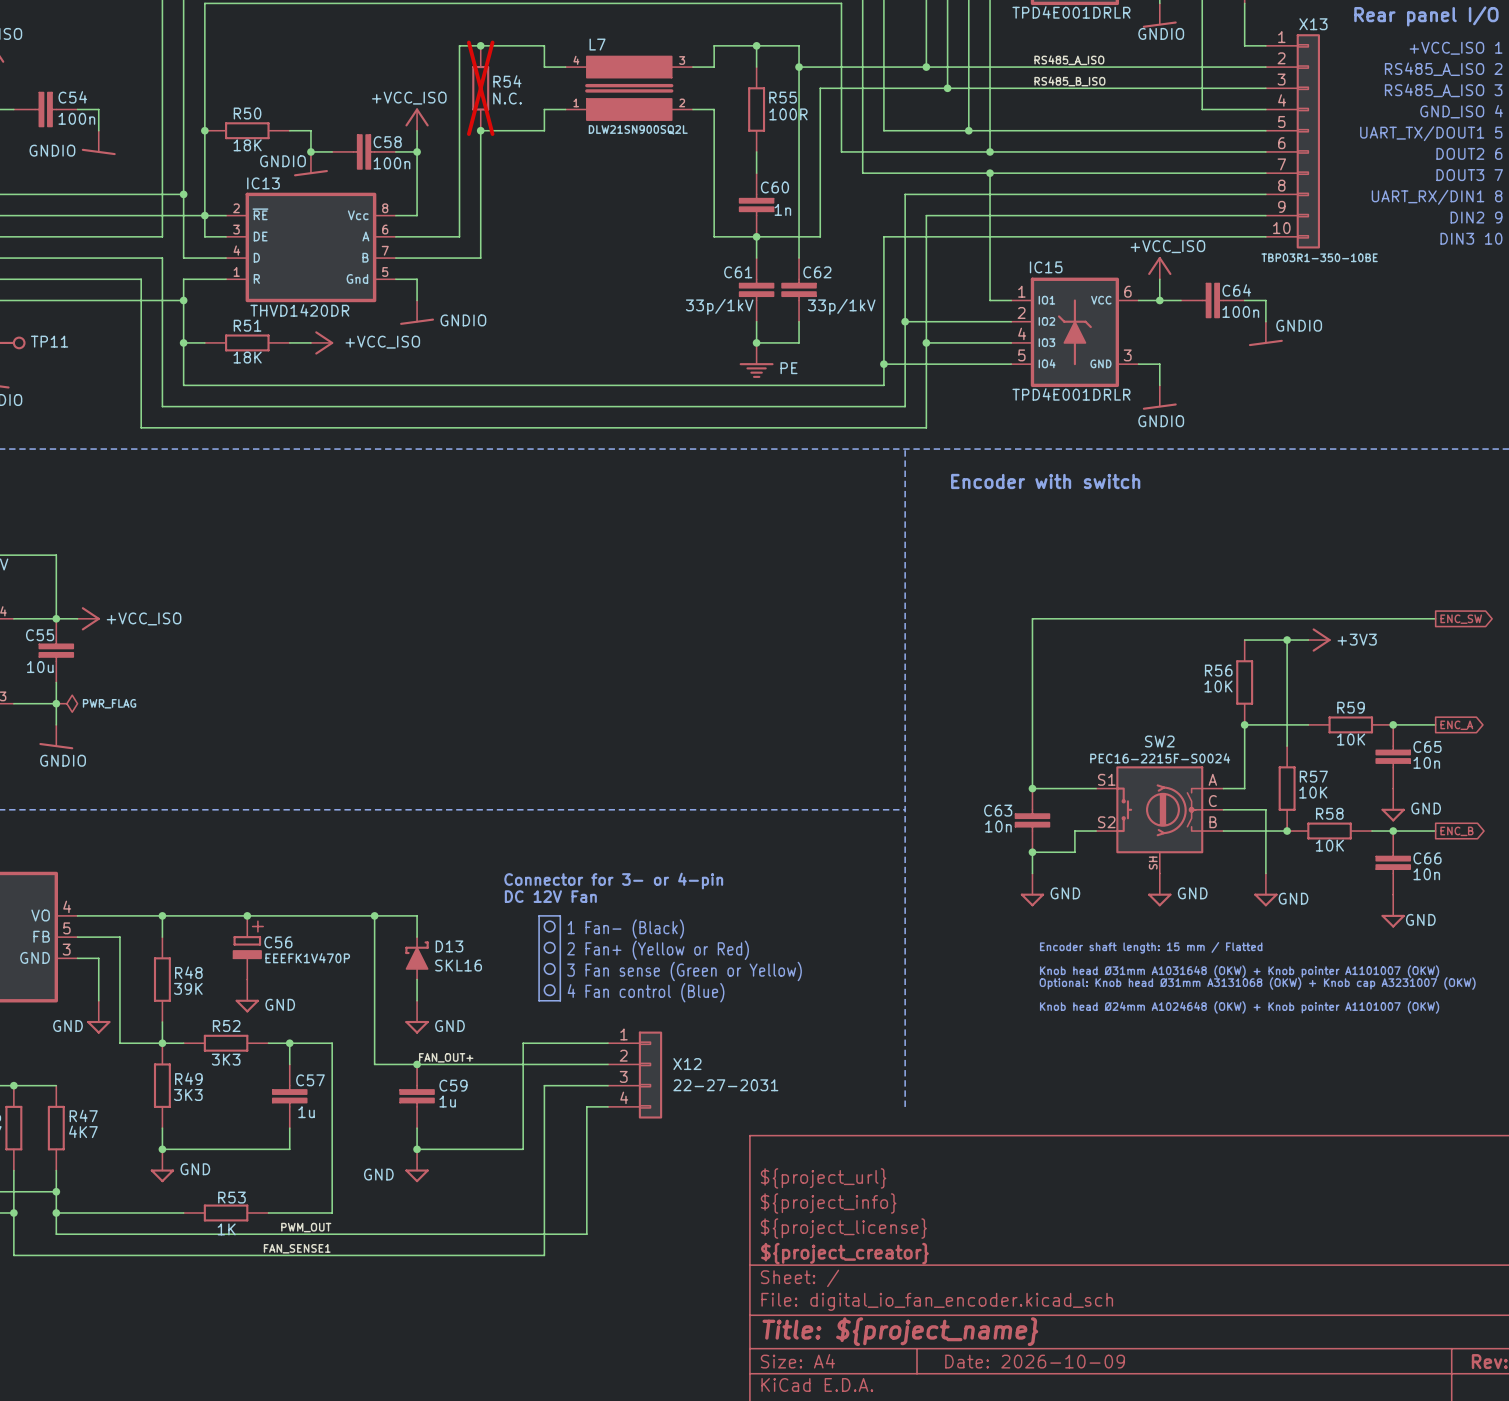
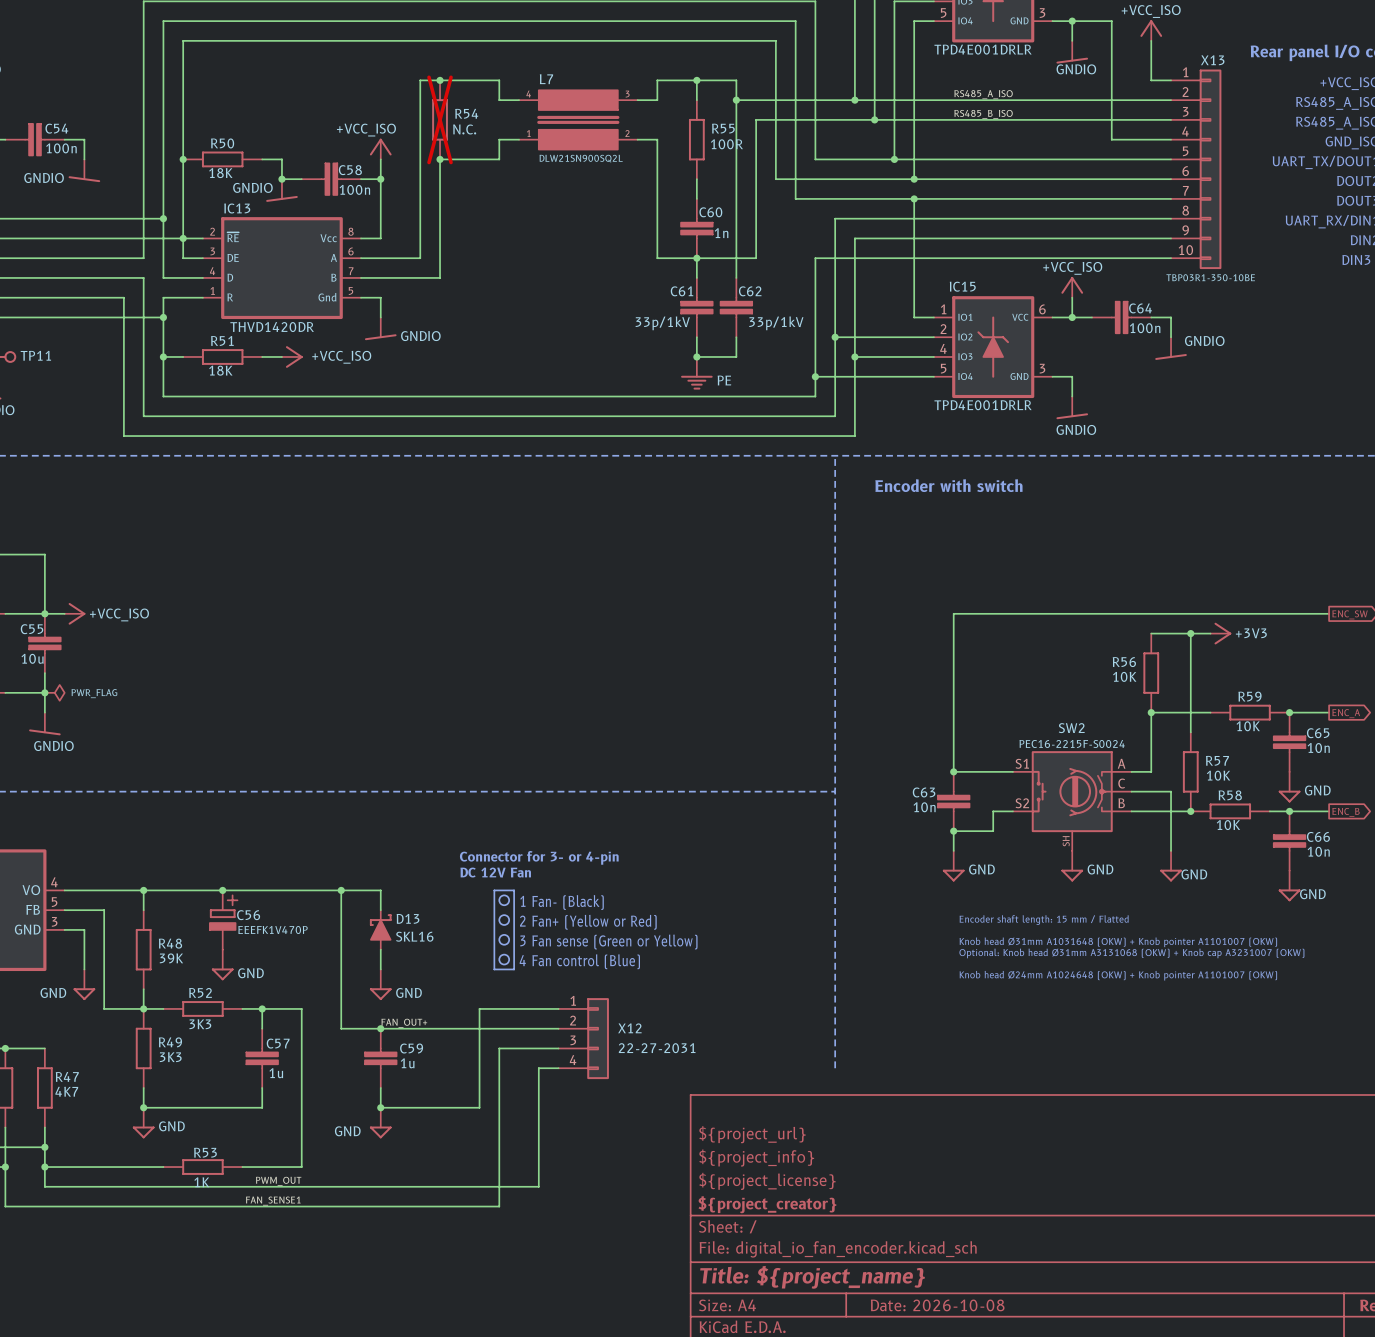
title block: Date: 2026-10-09 (1035, 1361) -> Date: 2026-10-08 (937, 1305)

